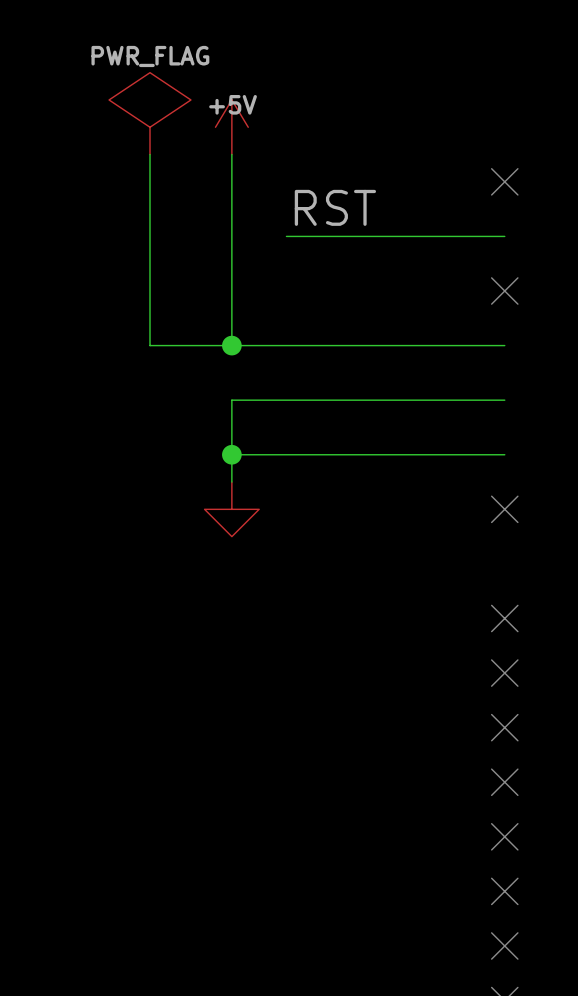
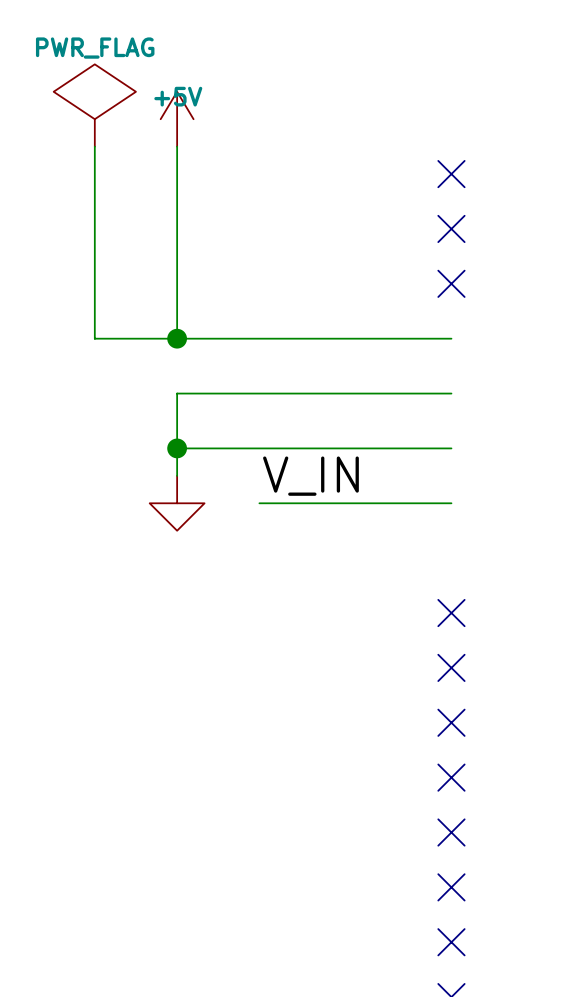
label: RST (335, 207) -> none
wire: (286, 236) (504, 236) -> none
no-connect mark: none -> (451, 228)
label: none -> V_IN (310, 476)
wire: none -> (259, 503) (451, 503)
no-connect mark: (504, 509) -> none

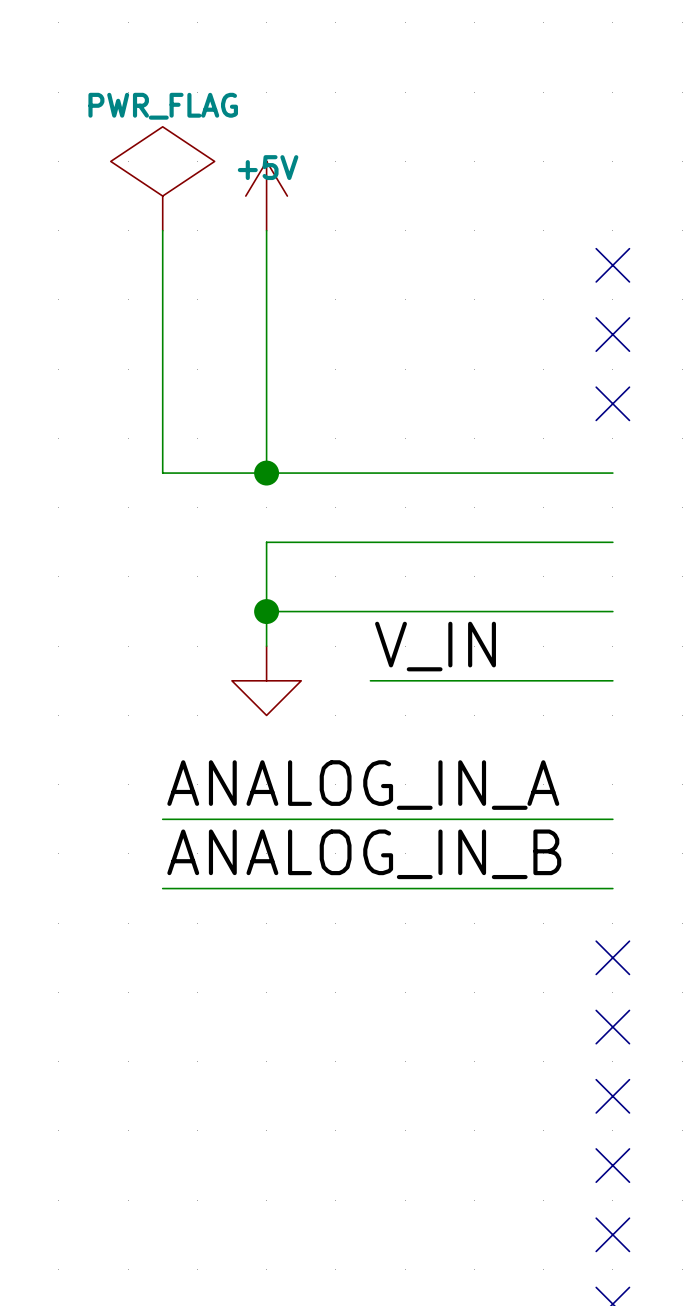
label: none -> ANALOG_IN_A (363, 785)
wire: none -> (162, 819) (612, 819)
no-connect mark: (451, 613) -> none
label: none -> ANALOG_IN_B (364, 854)
wire: none -> (162, 888) (612, 888)
no-connect mark: (451, 667) -> none

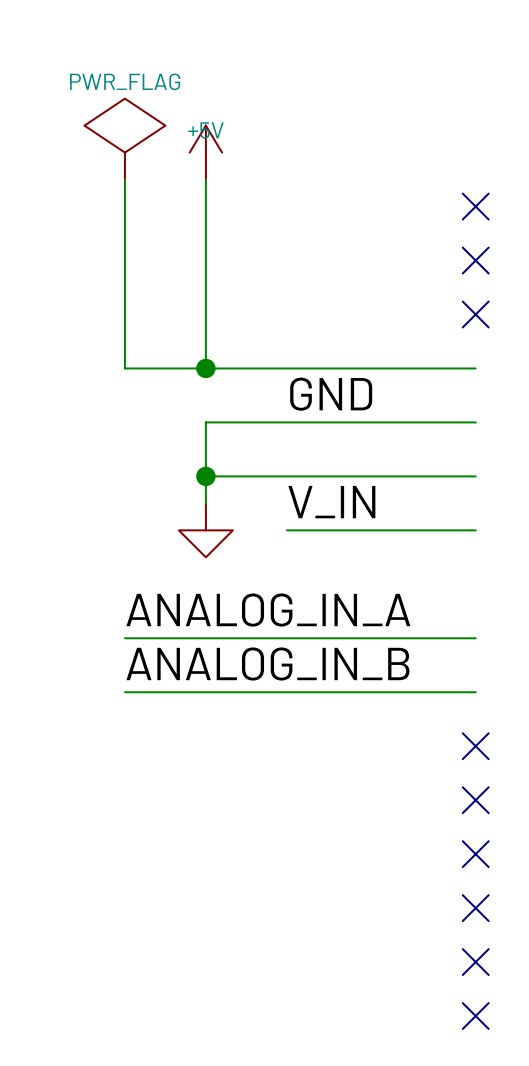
label: none -> GND (331, 394)

